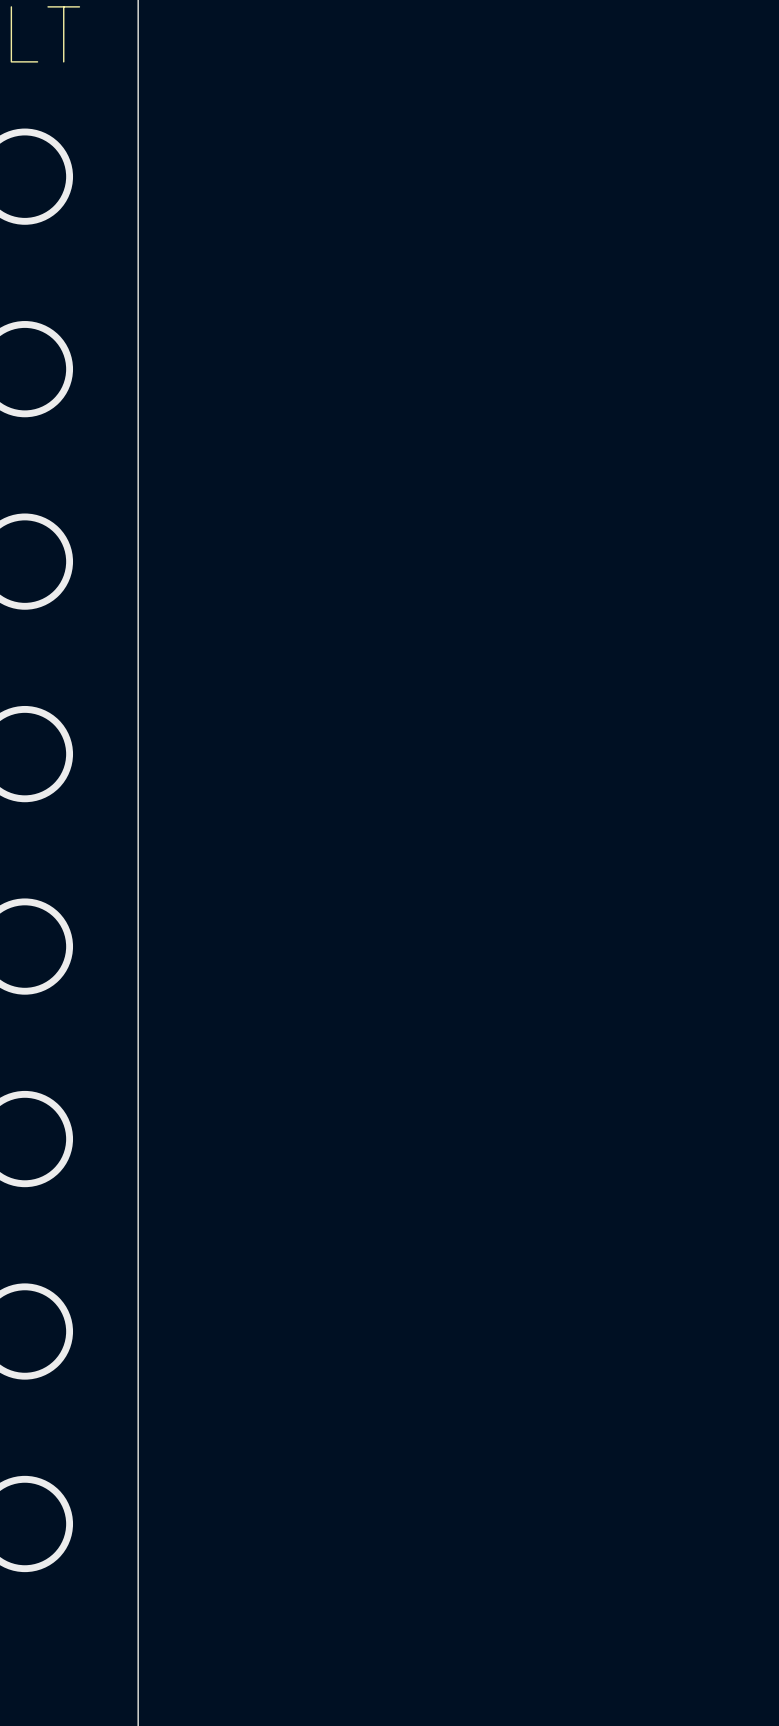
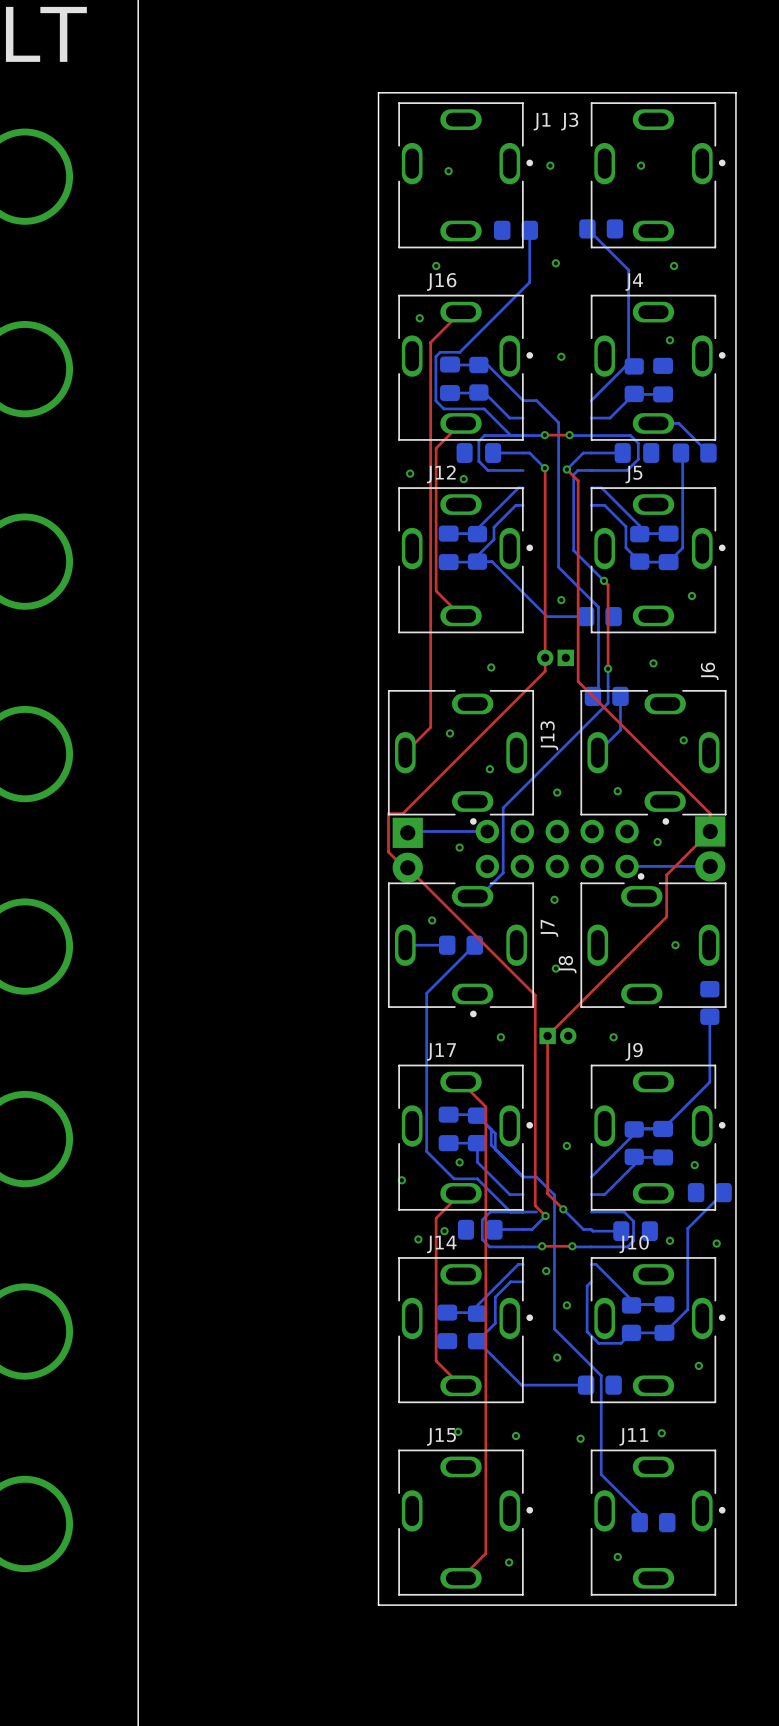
board edge: none -> (378, 92) (735, 92) (735, 1605) (378, 1605) (378, 92)
via: none -> (550, 165)
via: none -> (641, 165)
via: none -> (448, 171)
J1: none -> (465, 175)
J3: none -> (658, 175)
bottom track: none -> (587, 228) (628, 270) (628, 360) (634, 366) (625, 366) (591, 400)
part: none -> (601, 228)
part: none -> (515, 230)
bottom track: none -> (529, 230) (529, 282) (459, 352) (440, 352) (435, 356) (435, 400) (443, 408) (484, 408) (510, 435)
via: none -> (555, 263)
via: none -> (436, 266)
via: none -> (674, 266)
top track: none -> (460, 312) (430, 342) (430, 727) (405, 752)
via: none -> (419, 318)
via: none -> (669, 340)
via: none -> (561, 356)
bottom track: none -> (449, 364) (487, 365) (523, 400) (536, 400) (558, 422) (558, 567) (598, 607) (598, 690) (592, 696)
J16: none -> (465, 367)
J4: none -> (658, 367)
part: none -> (449, 378)
part: none -> (478, 378)
part: none -> (634, 380)
part: none -> (663, 380)
bottom track: none -> (449, 393) (484, 393) (509, 418) (523, 418)
bottom track: none -> (663, 394) (634, 393) (610, 418) (591, 418)
top track: none -> (460, 423) (436, 448) (436, 591) (460, 615)
bottom track: none -> (653, 423) (678, 423) (708, 453)
top track: none -> (544, 435) (569, 435)
via: none -> (544, 435)
bottom track: none -> (545, 435) (484, 435) (478, 441) (478, 461) (488, 470) (523, 470)
bottom track: none -> (569, 435) (630, 435) (638, 443) (638, 459) (627, 470) (577, 470) (573, 474) (573, 550) (605, 580)
via: none -> (569, 435)
part: none -> (478, 453)
bottom track: none -> (493, 453) (529, 453) (544, 468)
bottom track: none -> (622, 453) (583, 453) (566, 469)
part: none -> (636, 453)
bottom track: none -> (674, 453) (682, 454) (682, 548) (668, 562) (645, 562)
part: none -> (694, 453)
top track: none -> (544, 468) (545, 671) (402, 813) (388, 813) (388, 852) (404, 867) (407, 867) (535, 995) (535, 1205) (545, 1216)
via: none -> (544, 468)
top track: none -> (566, 469) (578, 480) (578, 681) (710, 813) (710, 831) (666, 875) (666, 916) (547, 1035) (547, 1193) (563, 1209)
via: none -> (566, 469)
via: none -> (410, 473)
via: none -> (463, 479)
bottom track: none -> (523, 487) (518, 487) (472, 533) (448, 533)
bottom track: none -> (591, 487) (601, 487) (639, 525) (639, 534) (668, 533)
bottom track: none -> (523, 505) (515, 505) (493, 527) (493, 539) (471, 562) (448, 562)
bottom track: none -> (591, 505) (604, 505) (625, 526) (625, 547) (639, 561)
part: none -> (448, 547)
part: none -> (477, 547)
part: none -> (639, 547)
part: none -> (668, 547)
J12: none -> (465, 560)
J5: none -> (658, 560)
bottom track: none -> (477, 561) (492, 561) (546, 616) (586, 616)
top track: none -> (603, 580) (608, 584) (608, 668)
via: none -> (603, 580)
via: none -> (691, 595)
via: none -> (561, 600)
part: none -> (599, 616)
part: none -> (555, 657)
via: none -> (653, 663)
via: none -> (491, 667)
bottom track: none -> (608, 668) (608, 703) (503, 807) (503, 872) (479, 896) (472, 896)
via: none -> (608, 668)
part: none -> (606, 696)
bottom track: none -> (620, 696) (620, 730) (597, 752)
via: none -> (449, 733)
via: none -> (683, 740)
J13: none -> (460, 757)
J6: none -> (653, 757)
via: none -> (489, 769)
via: none -> (617, 791)
via: none -> (557, 792)
bottom track: none -> (487, 831) (407, 832)
via: none -> (657, 842)
via: none -> (459, 847)
part: none -> (557, 848)
part: none -> (710, 848)
part: none -> (407, 850)
bottom track: none -> (627, 866) (710, 866)
via: none -> (554, 899)
via: none -> (432, 920)
J8: none -> (653, 940)
bottom track: none -> (405, 945) (447, 945)
part: none -> (460, 945)
bottom track: none -> (474, 945) (426, 993) (426, 1151) (454, 1178) (477, 1178) (510, 1212)
via: none -> (675, 945)
J7: none -> (460, 949)
via: none -> (555, 968)
part: none -> (709, 1002)
bottom track: none -> (709, 1016) (709, 1082) (663, 1128) (634, 1129)
part: none -> (557, 1035)
via: none -> (500, 1037)
via: none -> (613, 1037)
top track: none -> (460, 1081) (485, 1106) (485, 1553) (460, 1578)
bottom track: none -> (448, 1114) (476, 1114) (495, 1133) (495, 1149)
part: none -> (448, 1128)
bottom track: none -> (639, 1128) (591, 1177)
part: none -> (477, 1129)
bottom track: none -> (491, 1129) (491, 1145) (523, 1177) (536, 1177) (554, 1194) (554, 1328) (601, 1375) (601, 1474) (639, 1512) (639, 1522)
J17: none -> (465, 1137)
J9: none -> (658, 1137)
bottom track: none -> (448, 1143) (477, 1143) (477, 1162) (509, 1194) (523, 1194)
part: none -> (634, 1143)
part: none -> (663, 1143)
via: none -> (566, 1145)
bottom track: none -> (663, 1157) (634, 1156) (634, 1164) (604, 1194) (591, 1194)
via: none -> (459, 1162)
via: none -> (694, 1165)
via: none -> (401, 1180)
part: none -> (709, 1192)
bottom track: none -> (723, 1192) (687, 1228) (687, 1309) (664, 1332) (631, 1332) (621, 1343) (598, 1343) (587, 1331) (587, 1285) (591, 1281)
top track: none -> (460, 1193) (436, 1218) (436, 1360) (460, 1385)
bottom track: none -> (563, 1209) (583, 1229) (621, 1231)
via: none -> (563, 1209)
bottom track: none -> (536, 1212) (490, 1212) (482, 1220) (482, 1239) (489, 1246) (542, 1246)
bottom track: none -> (591, 1212) (624, 1212) (633, 1221) (633, 1240) (627, 1246) (571, 1246)
bottom track: none -> (545, 1216) (532, 1229) (494, 1229)
via: none -> (545, 1216)
part: none -> (480, 1229)
via: none -> (444, 1231)
part: none -> (635, 1231)
via: none -> (418, 1239)
via: none -> (669, 1240)
via: none -> (716, 1243)
top track: none -> (542, 1246) (572, 1246)
via: none -> (542, 1246)
via: none -> (572, 1246)
bottom track: none -> (523, 1264) (518, 1264) (470, 1312) (447, 1312)
bottom track: none -> (591, 1264) (596, 1264) (635, 1304)
via: none -> (546, 1271)
bottom track: none -> (523, 1281) (510, 1281) (495, 1297) (495, 1323) (477, 1341) (521, 1385) (586, 1385)
bottom track: none -> (664, 1304) (631, 1305)
via: none -> (566, 1305)
part: none -> (664, 1318)
part: none -> (631, 1319)
part: none -> (447, 1326)
part: none -> (477, 1327)
J14: none -> (465, 1330)
J10: none -> (658, 1330)
via: none -> (557, 1357)
via: none -> (698, 1365)
part: none -> (599, 1385)
via: none -> (458, 1431)
via: none -> (661, 1433)
via: none -> (515, 1436)
via: none -> (580, 1438)
J15: none -> (465, 1522)
part: none -> (653, 1522)
J11: none -> (658, 1522)
via: none -> (617, 1556)
via: none -> (509, 1562)

